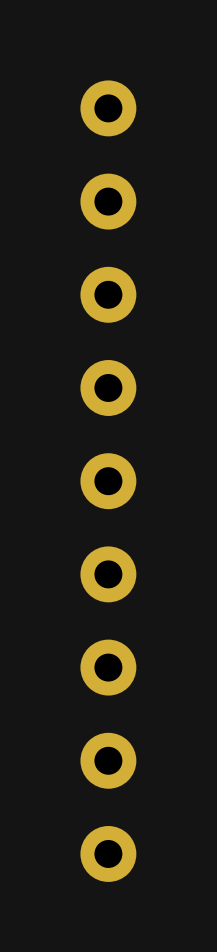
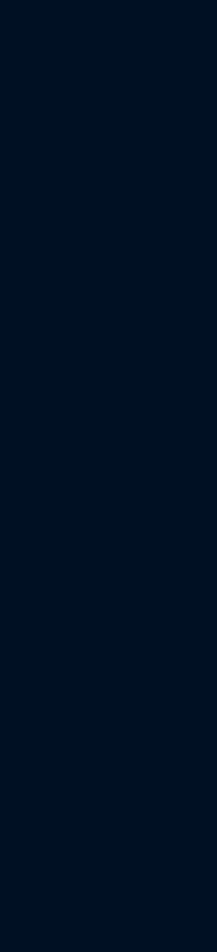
part: (108, 481) -> none

